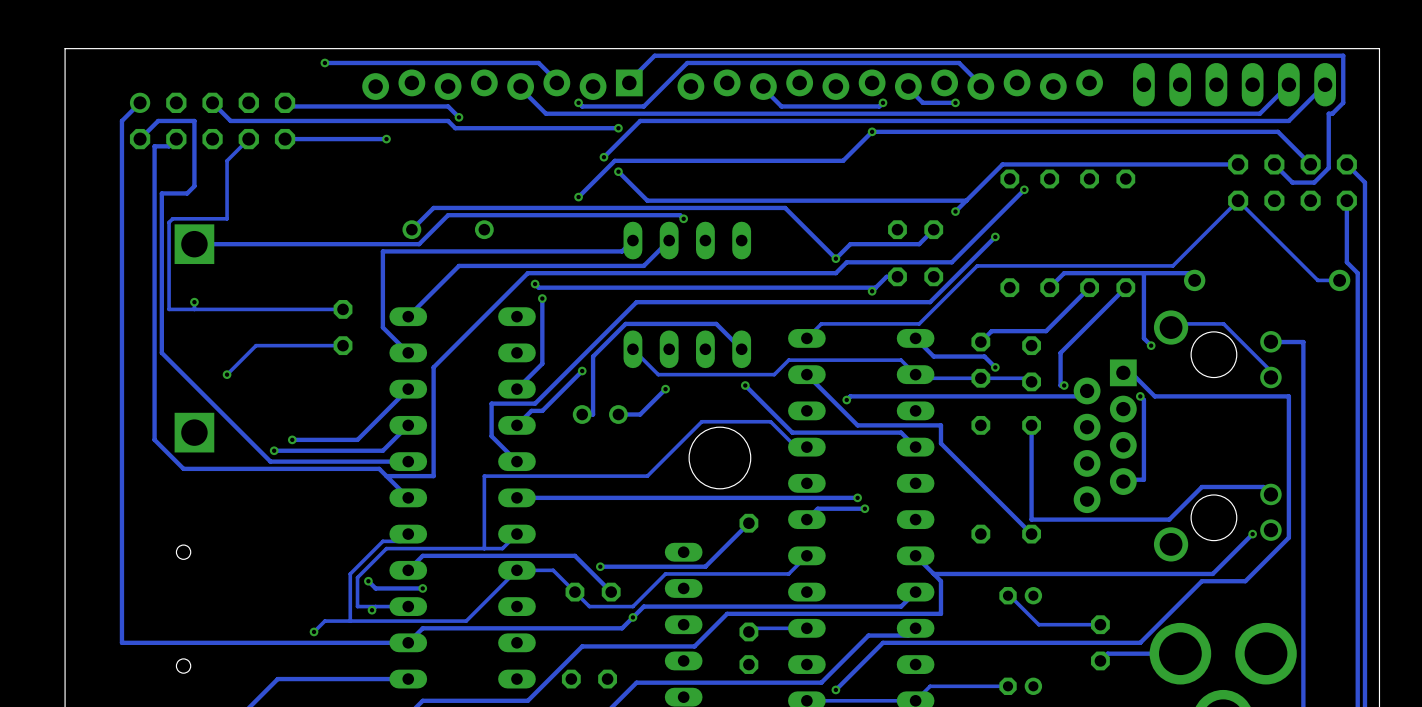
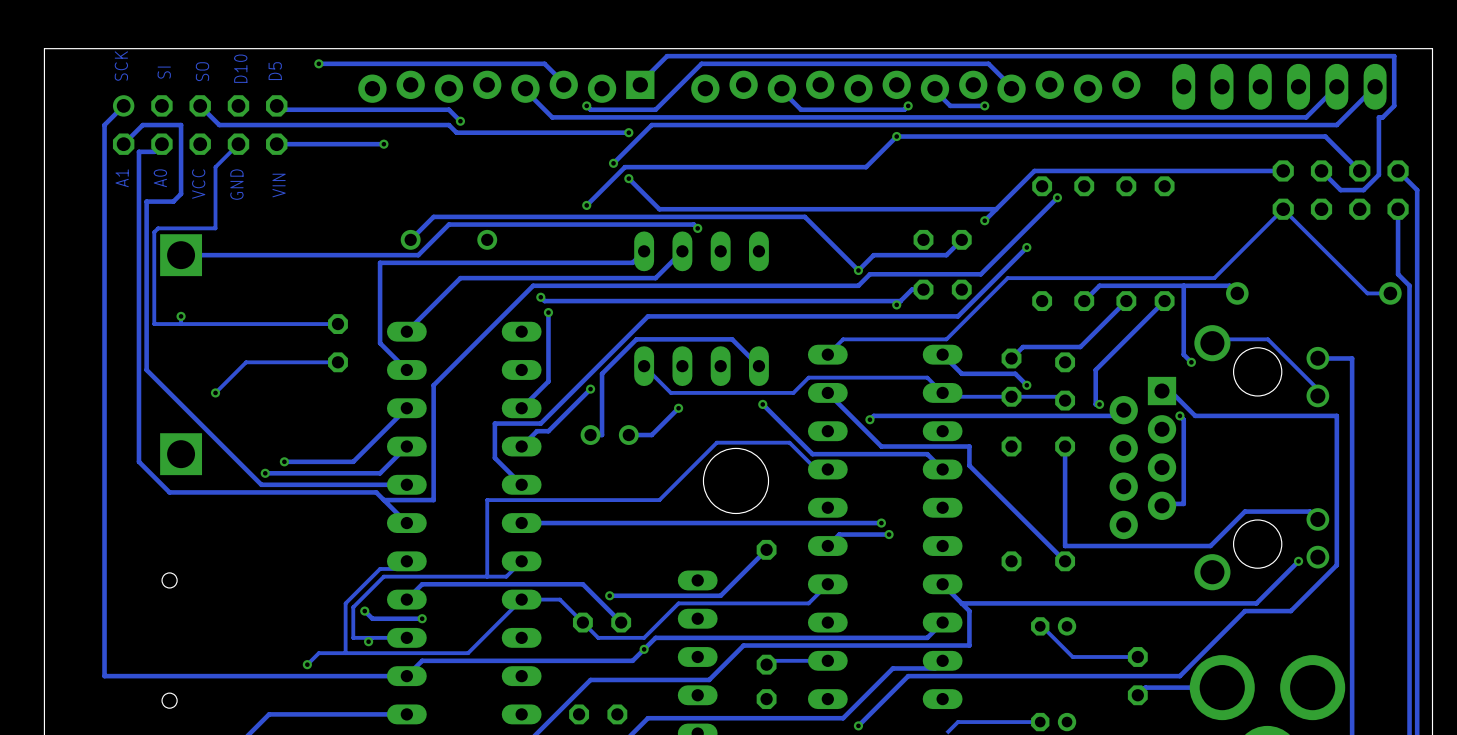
text: none -> SCK (121, 66)
text: none -> D10 (240, 68)
text: none -> D5 (275, 71)
text: none -> SO (202, 71)
text: none -> SI (164, 72)
text: none -> A1 (122, 178)
text: none -> A0 (160, 178)
text: none -> VCC (198, 184)
text: none -> GND (236, 184)
text: none -> VIN (279, 185)

